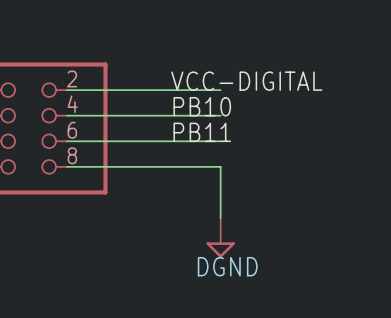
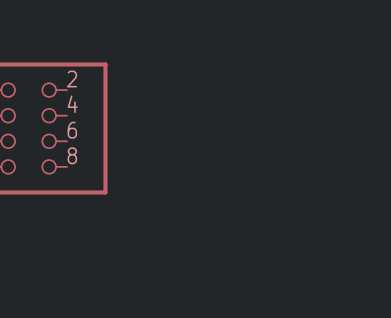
label: VCC-DIGITAL (246, 81) -> none
wire: (67, 90) (220, 90) -> none
label: PB10 (202, 106) -> none
wire: (67, 115) (220, 115) -> none
label: PB11 (202, 132) -> none
wire: (67, 141) (220, 141) -> none
wire: (67, 166) (220, 166) (220, 218) -> none
power symbol: DGND (220, 237) -> none

